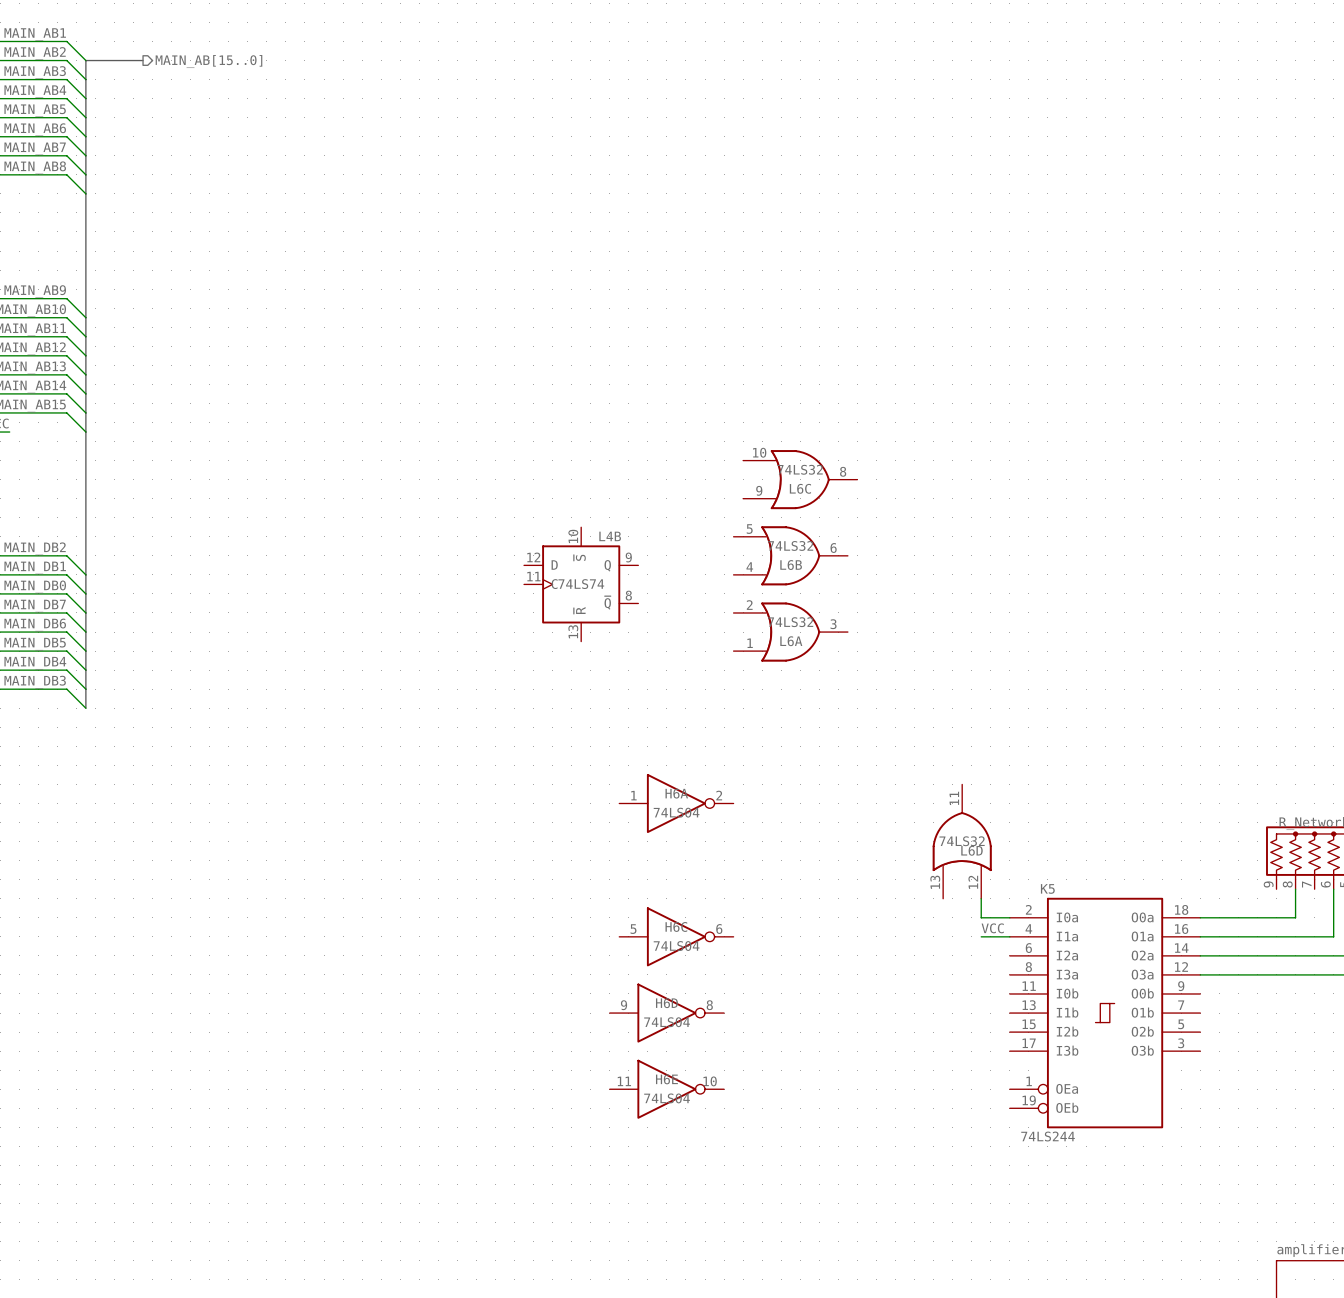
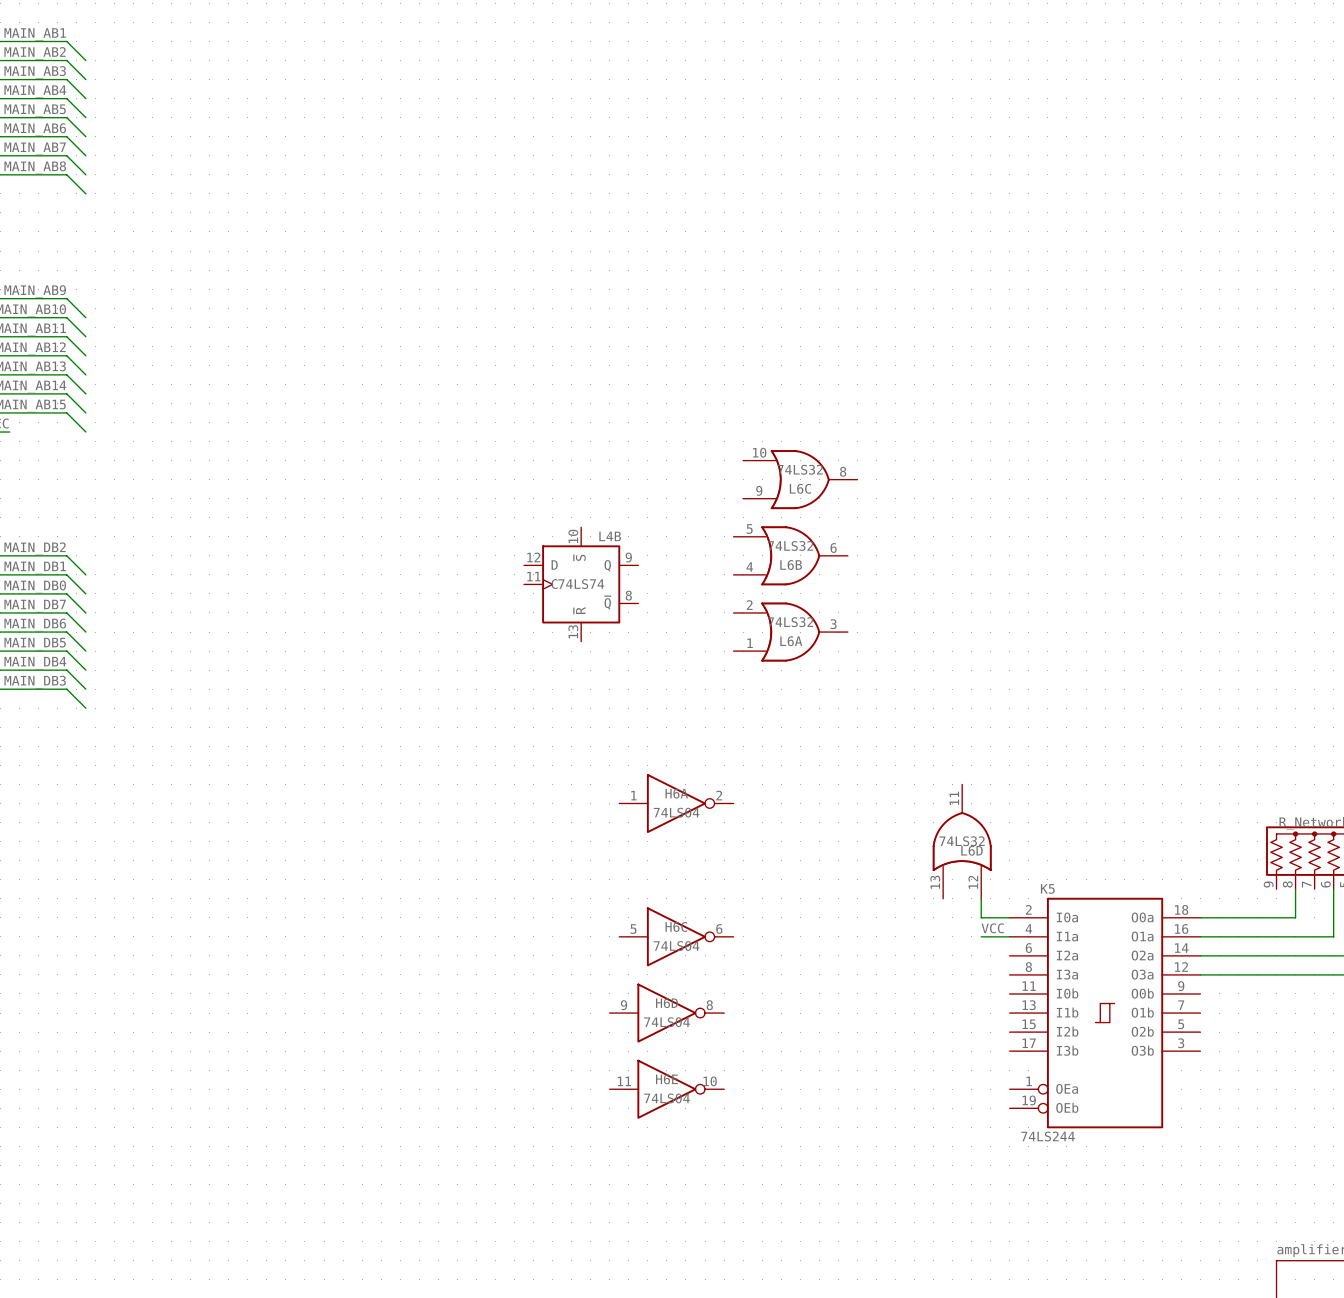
bus: (143, 60) (85, 60) (85, 708) -> none
hierarchical label: MAIN_AB[15..0] (208, 61) -> none

